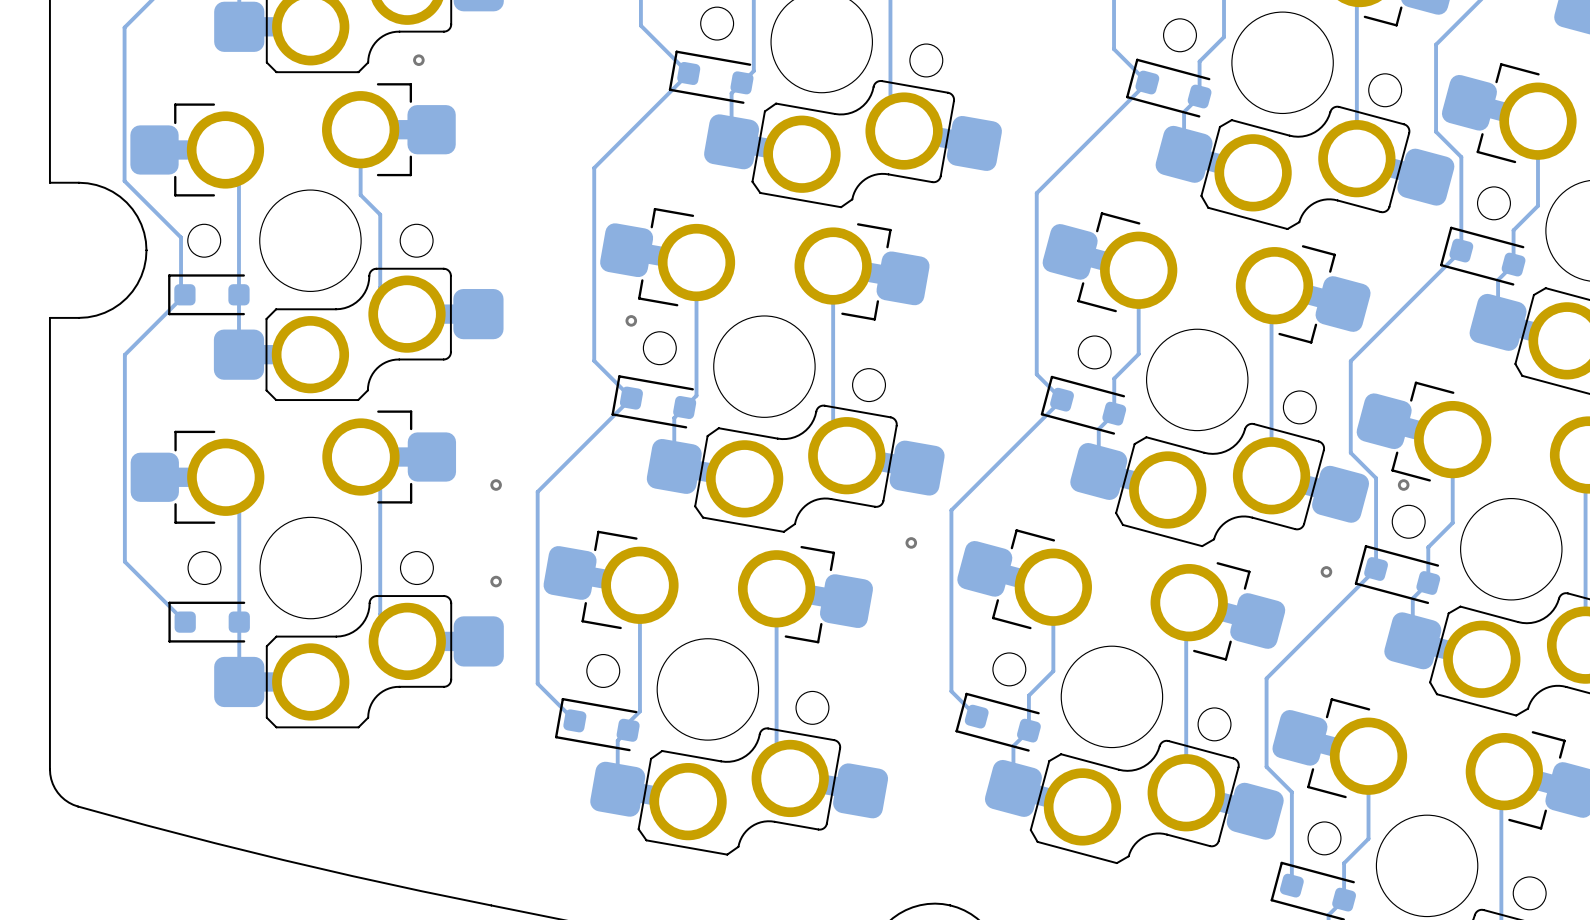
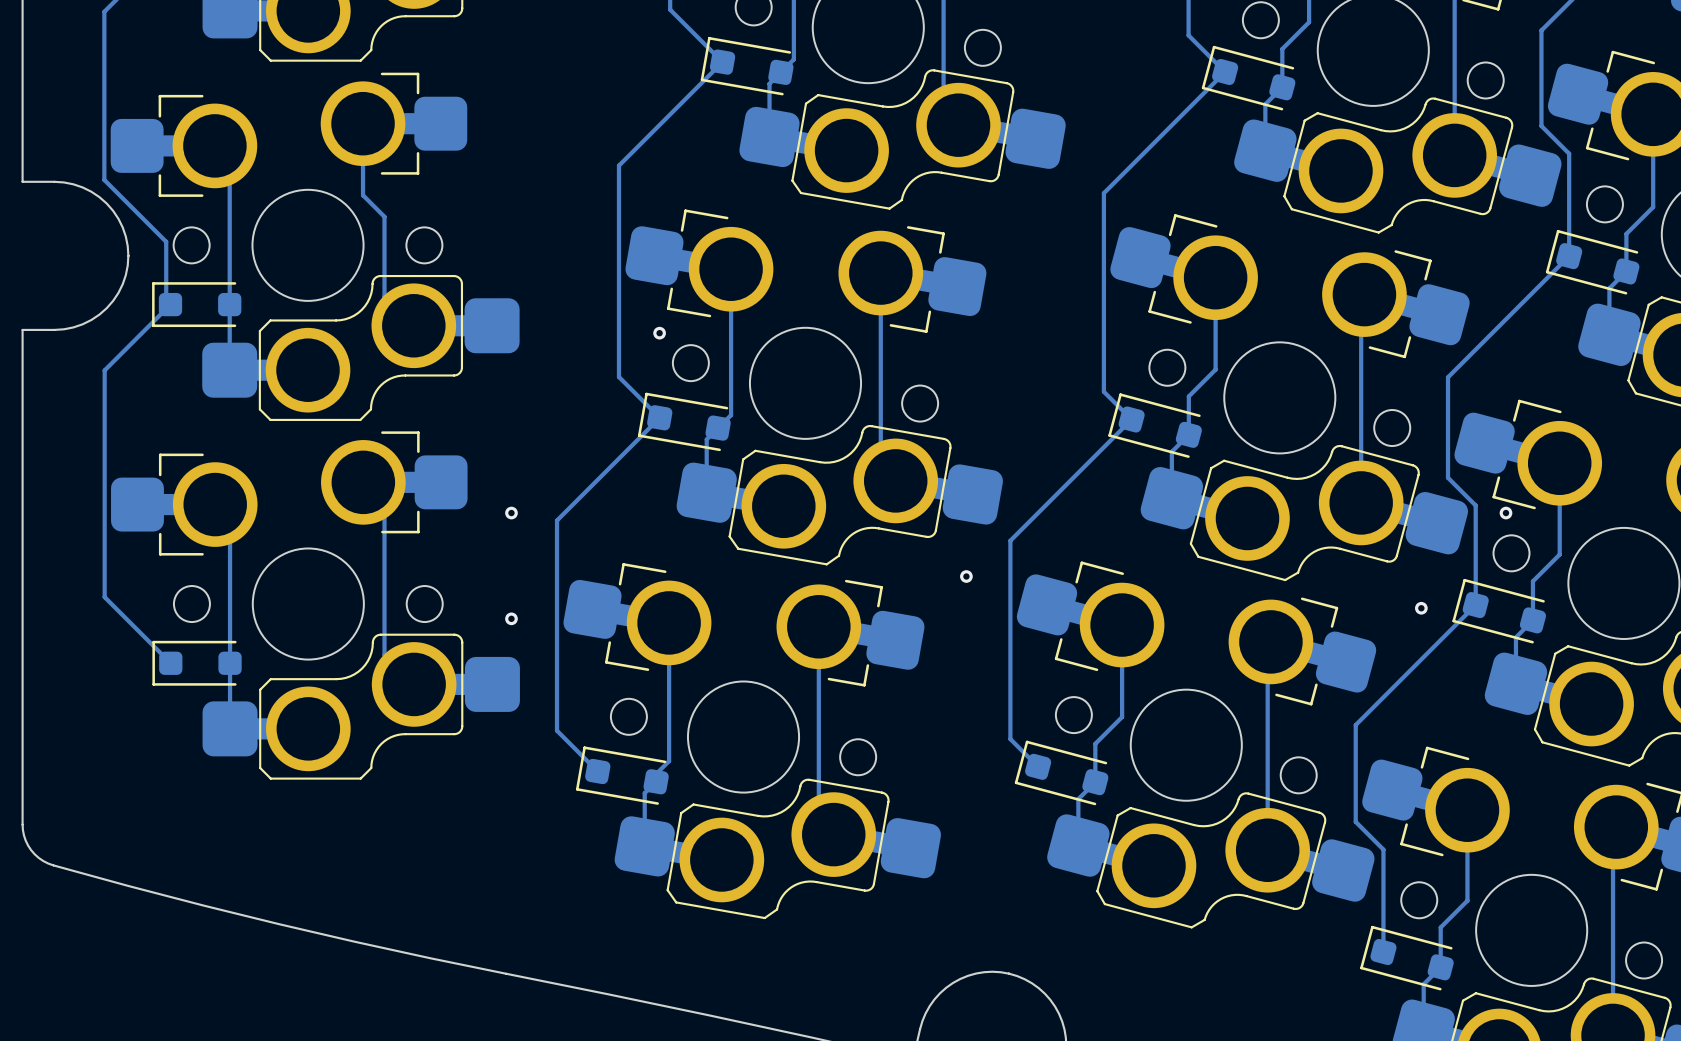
via: (418, 60) -> none

